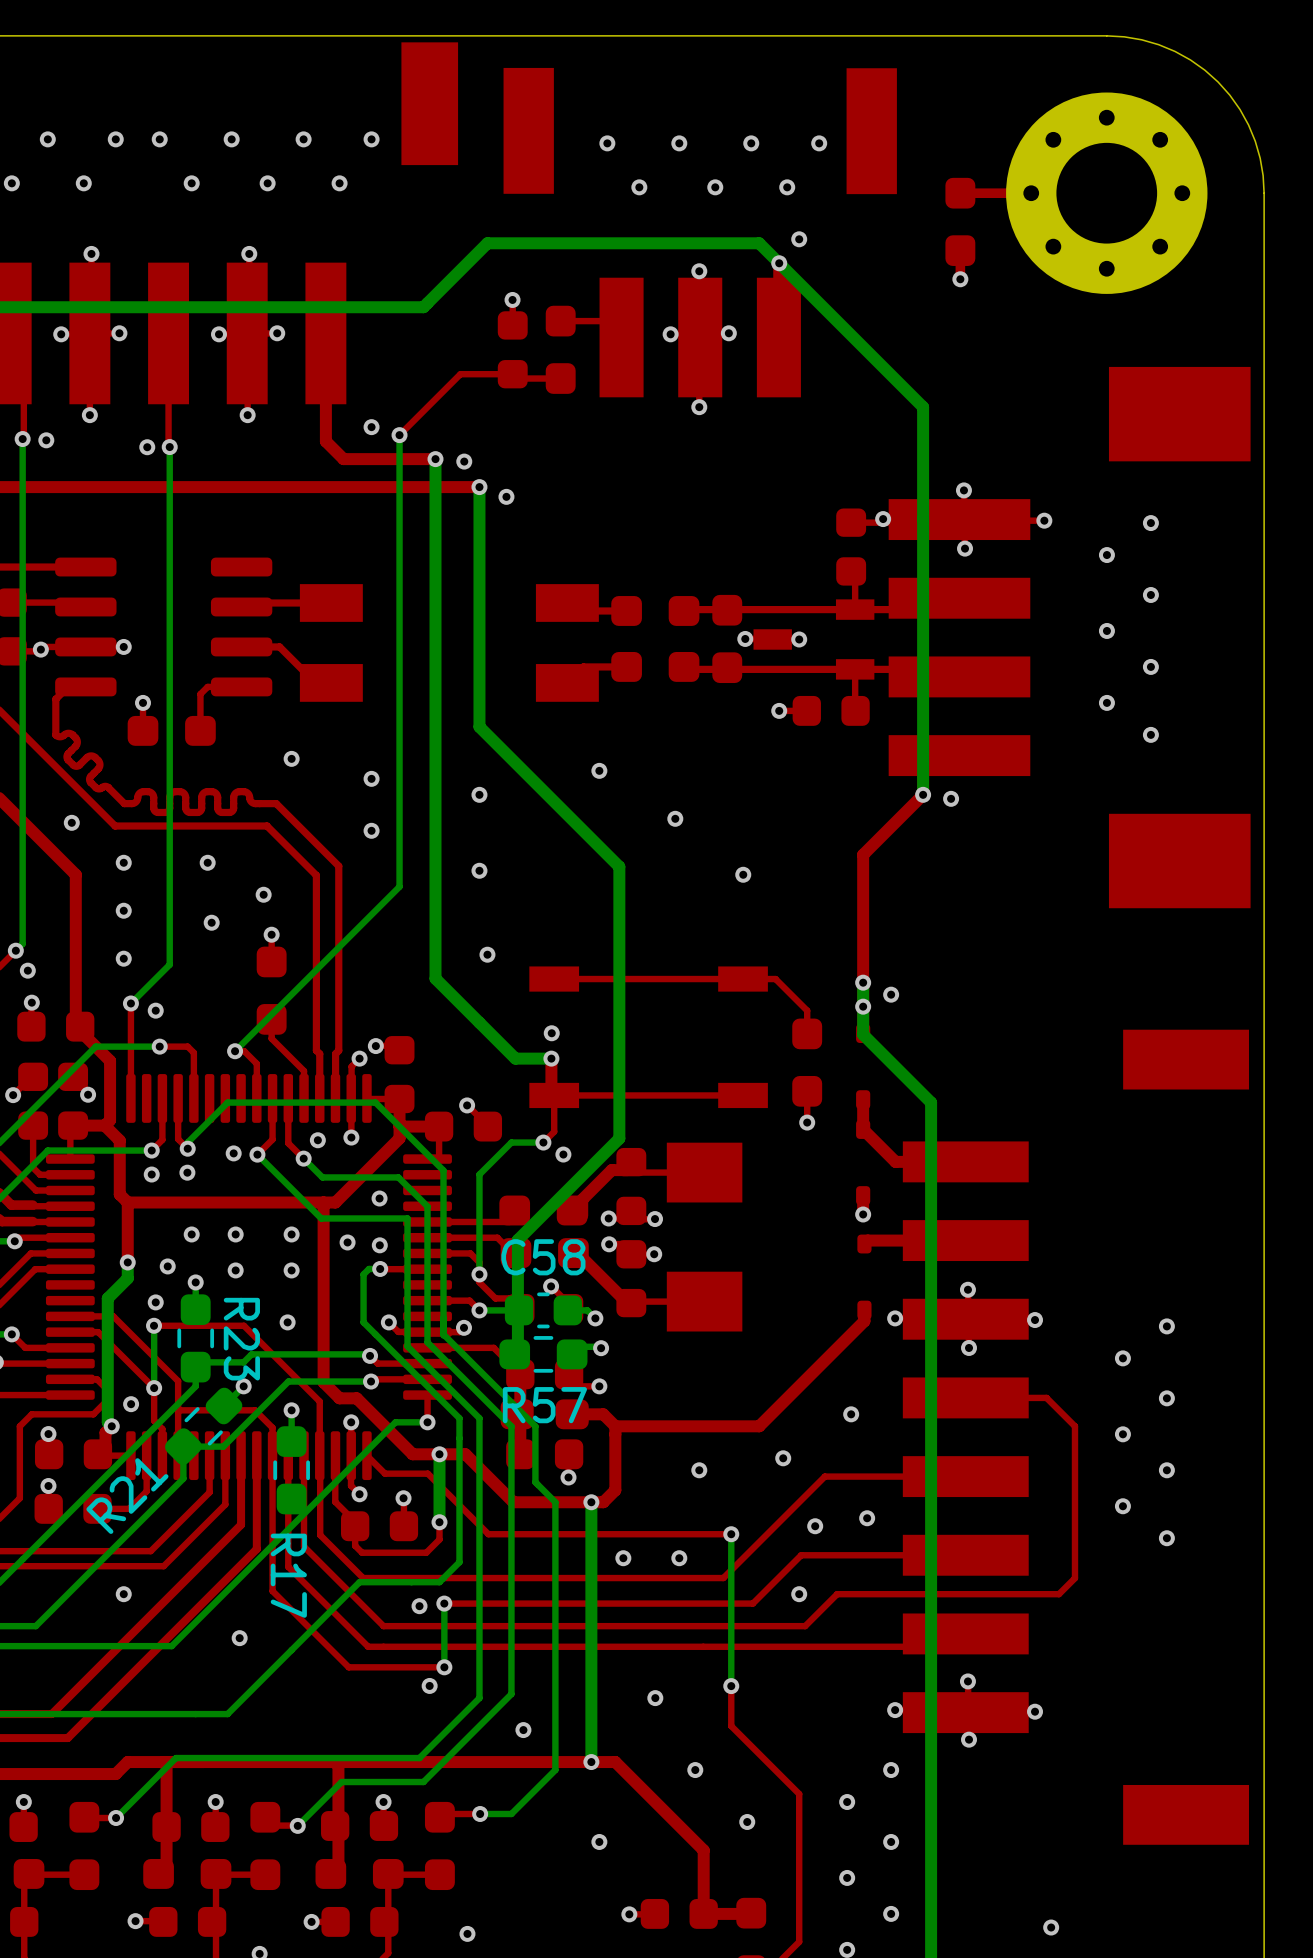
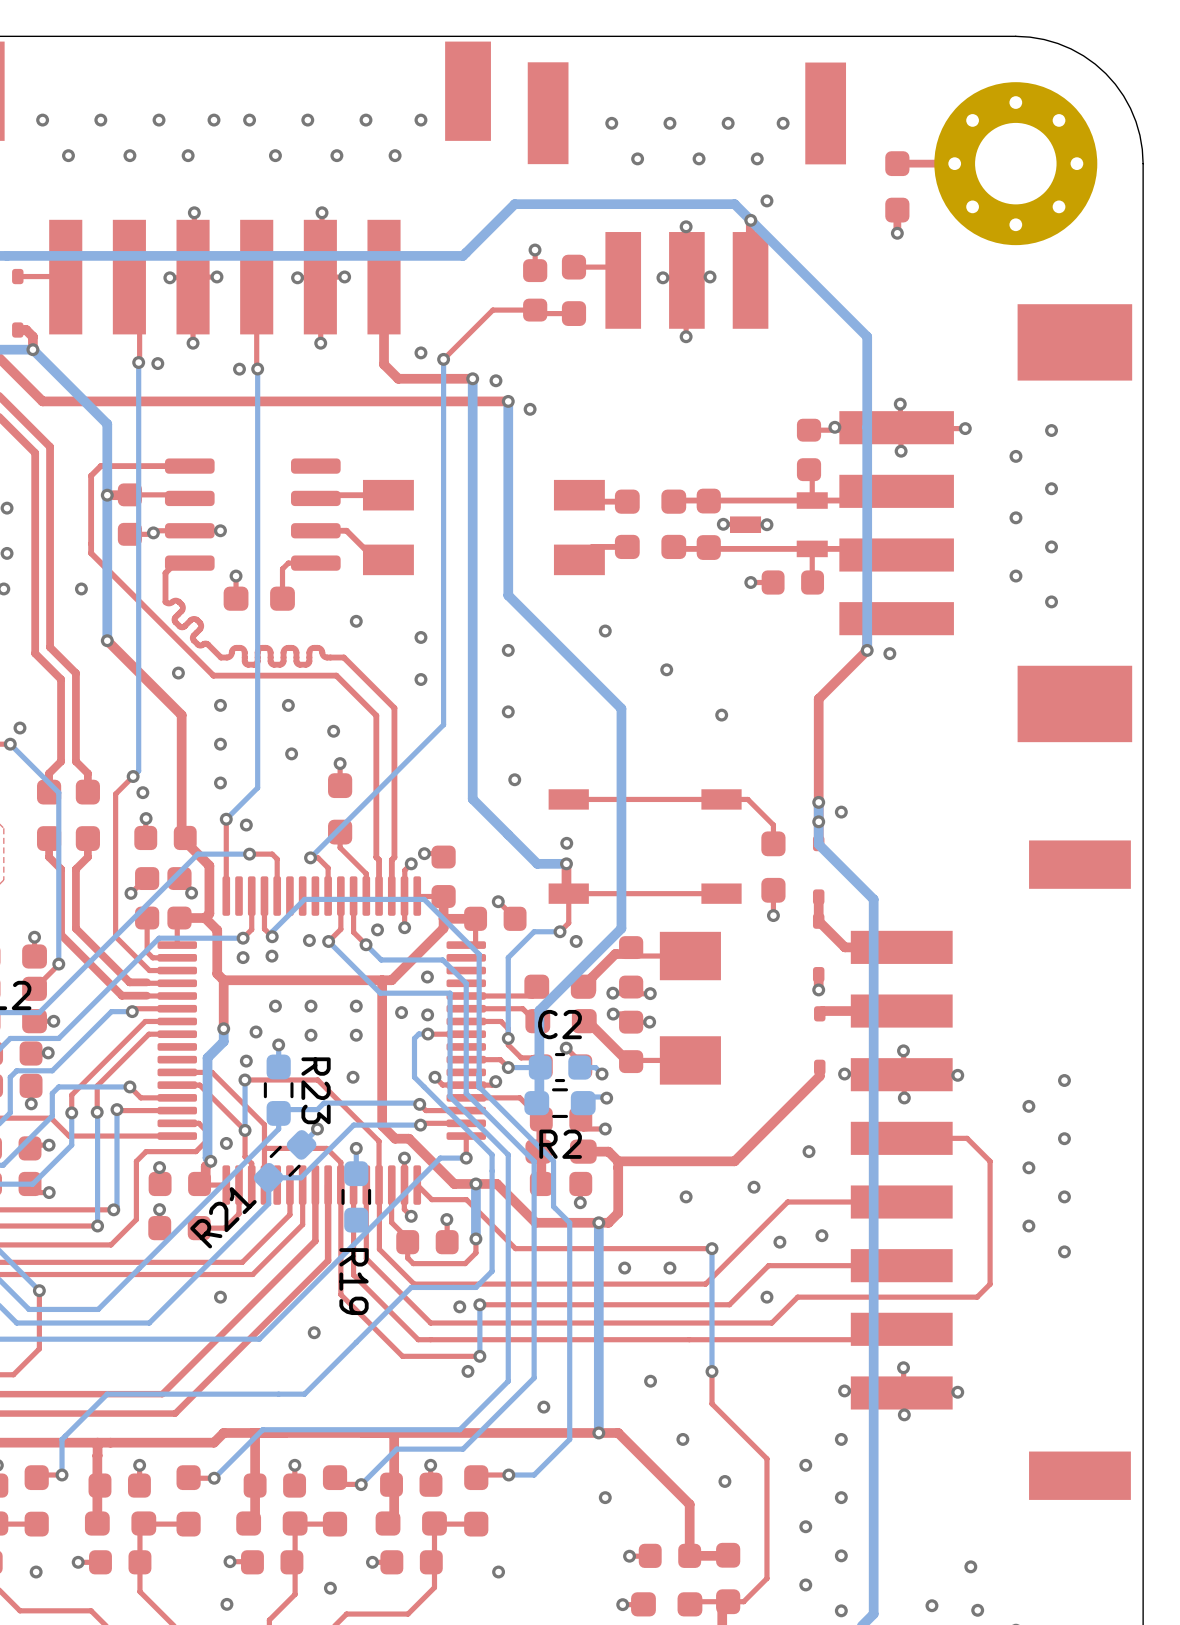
C58 name: C58 (543, 1257) -> C2 (560, 1024)
R57 name: R57 (544, 1405) -> R2 (560, 1144)
R17 name: R17 (288, 1575) -> R19 (354, 1281)

